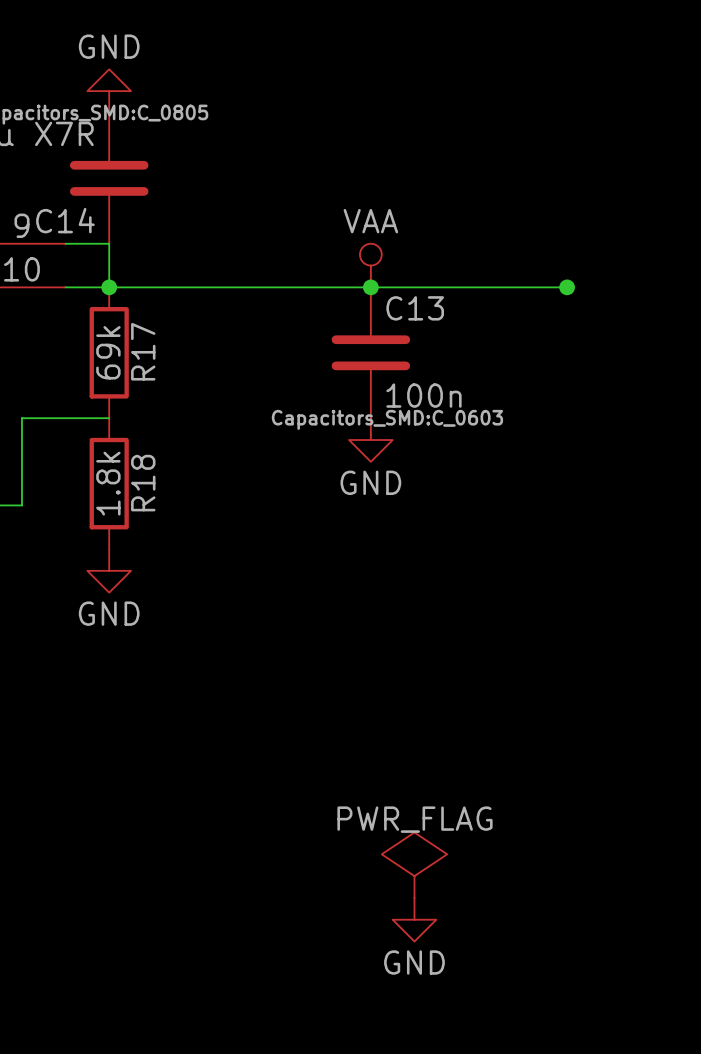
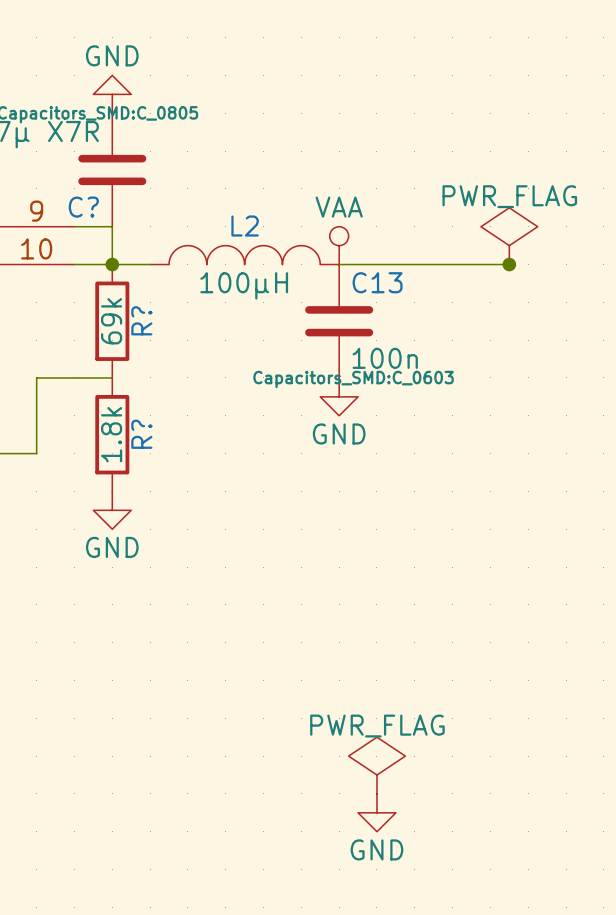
C14 name: C14 (65, 220) -> C? (83, 207)
power symbol: none -> PWR_FLAG (509, 236)
L2: none -> 100µH (244, 255)
wire: (152, 287) (370, 287) -> none
junction: (370, 287) -> none
R17 name: R17 (143, 351) -> R? (141, 320)
R18 name: R18 (143, 483) -> R? (141, 434)

